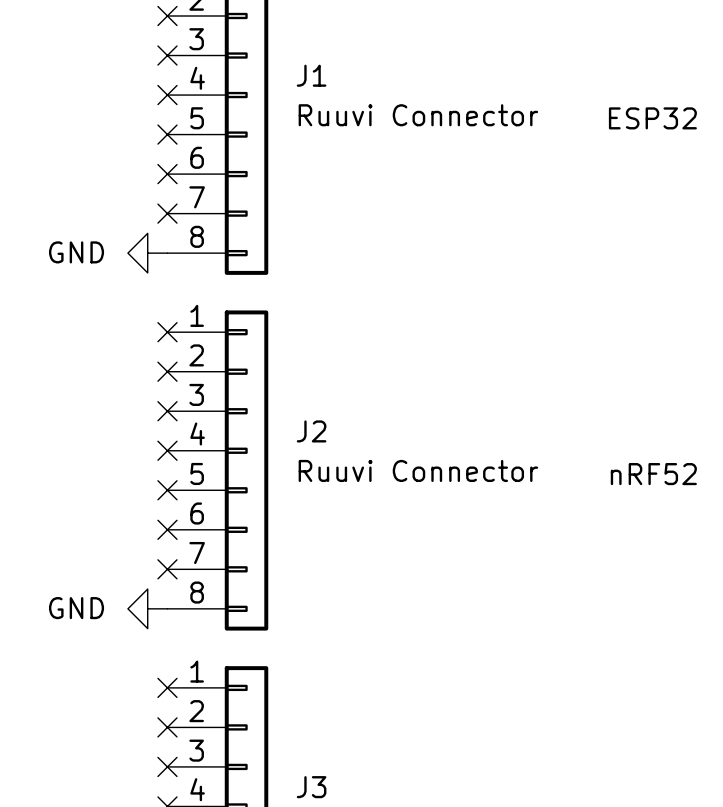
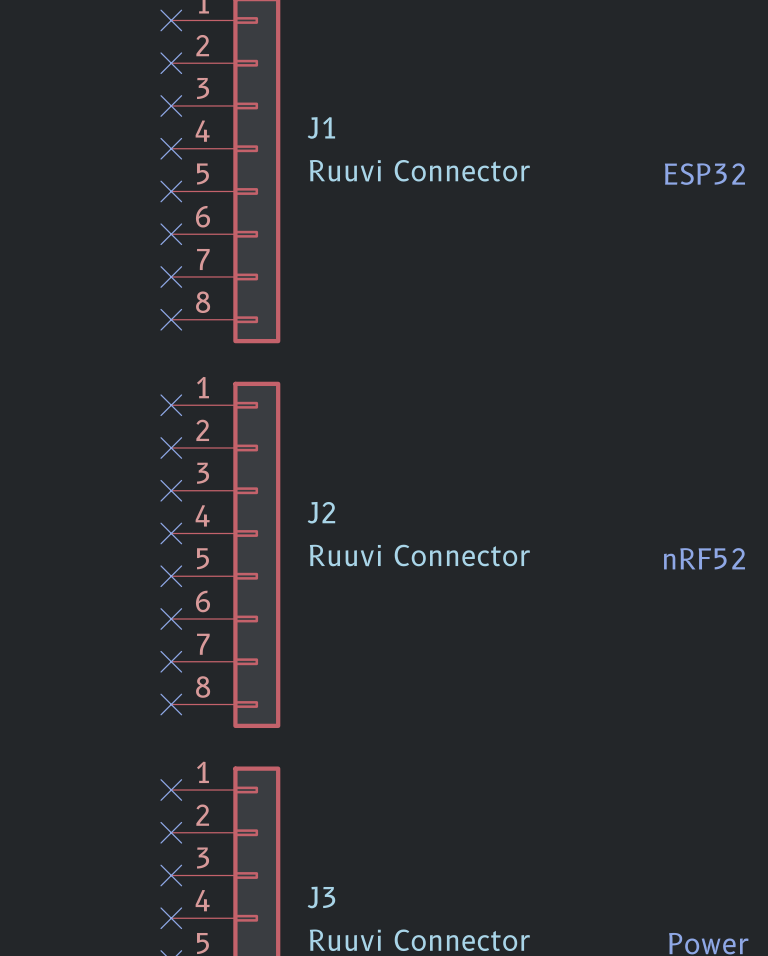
power symbol: GND (147, 253) -> none
no-connect mark: none -> (171, 319)
power symbol: GND (147, 608) -> none
no-connect mark: none -> (171, 704)

